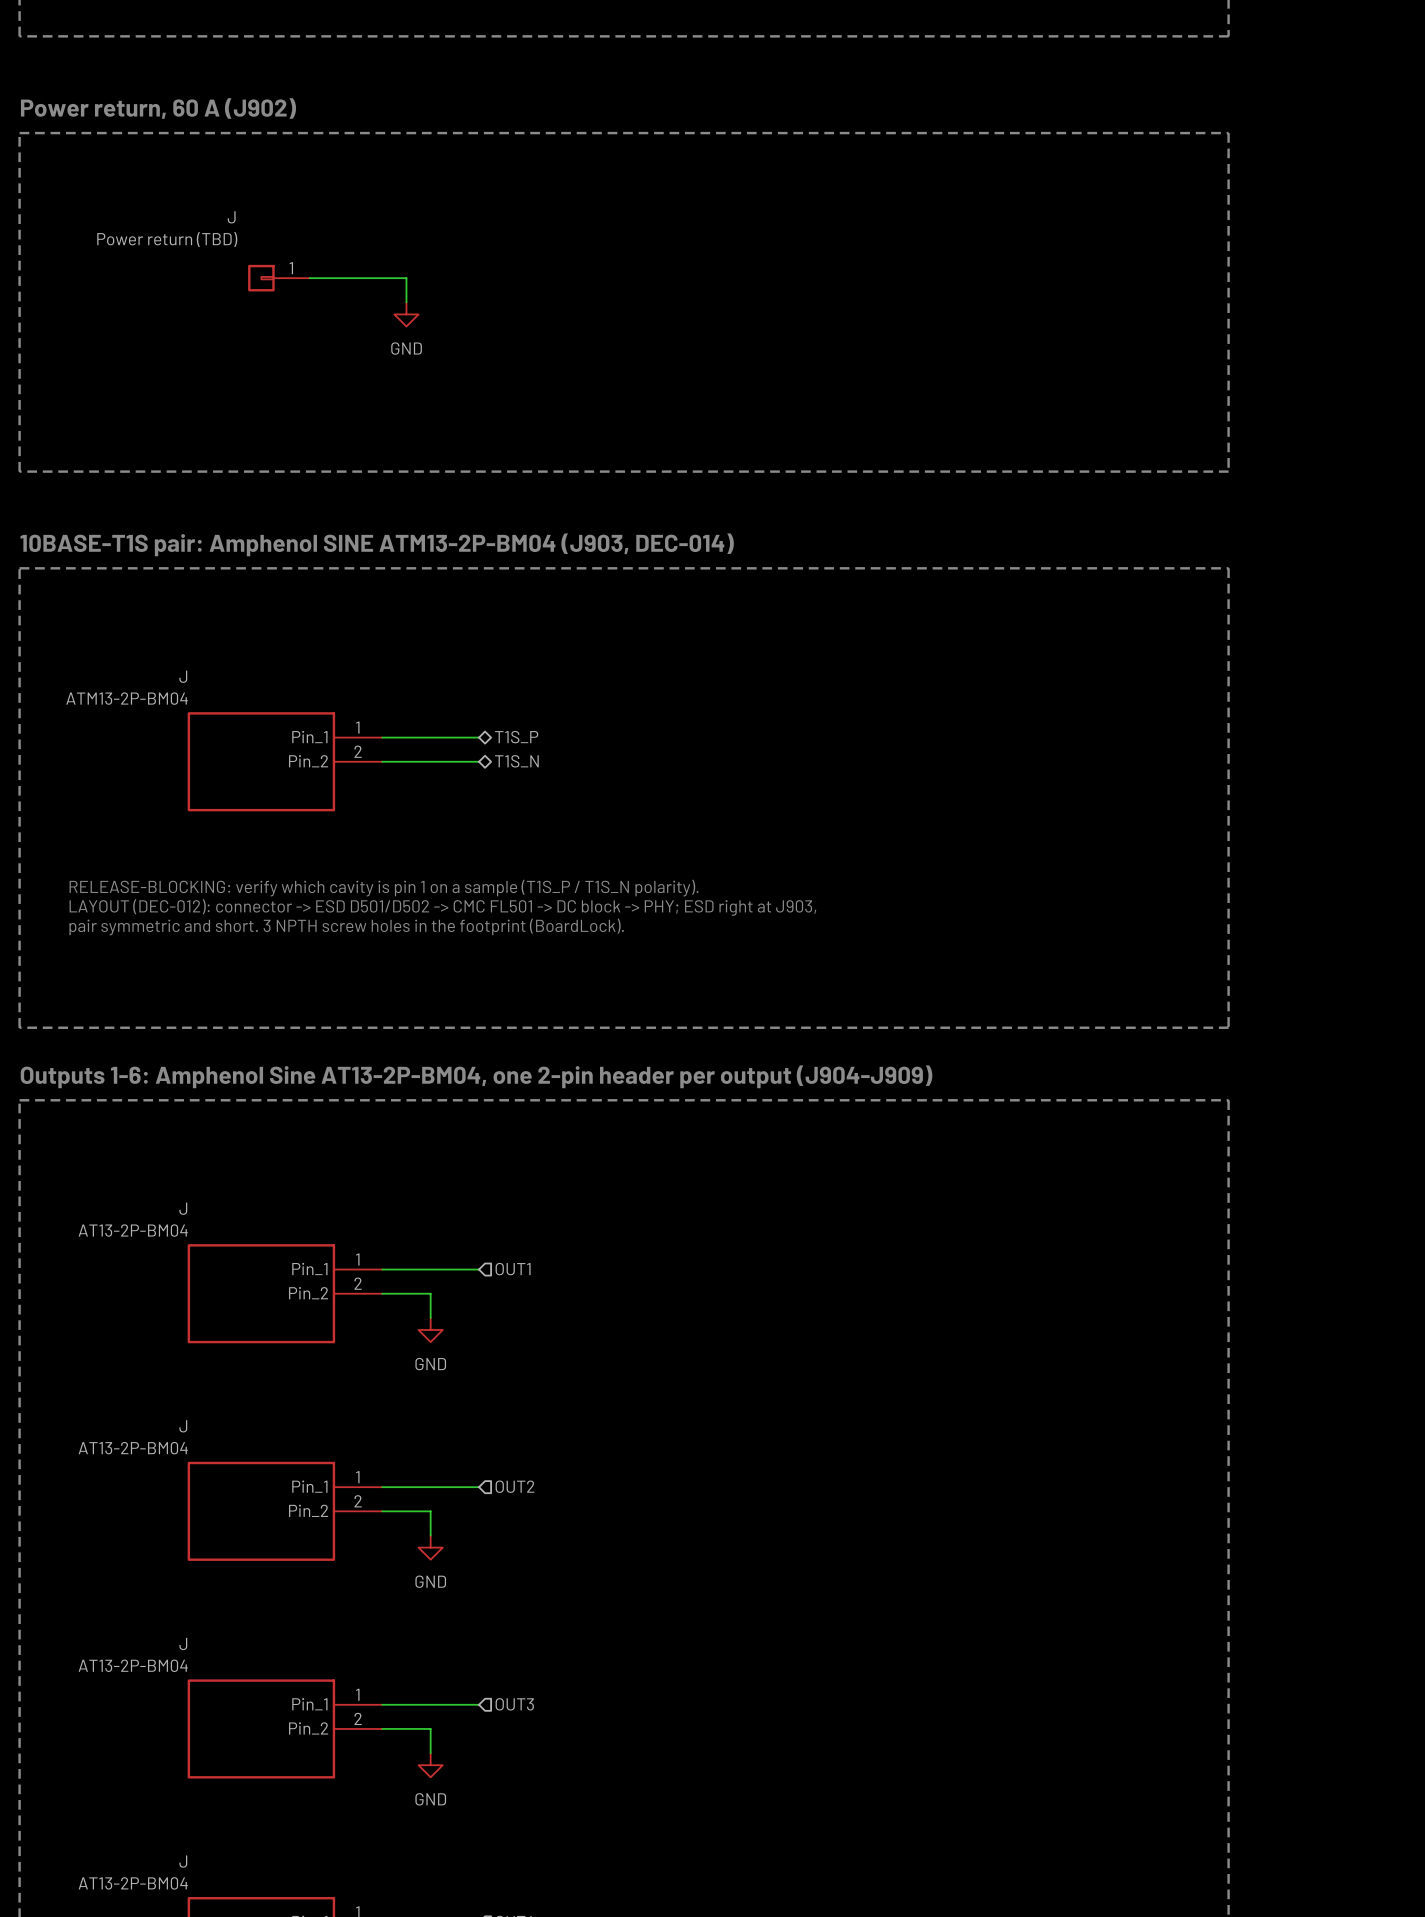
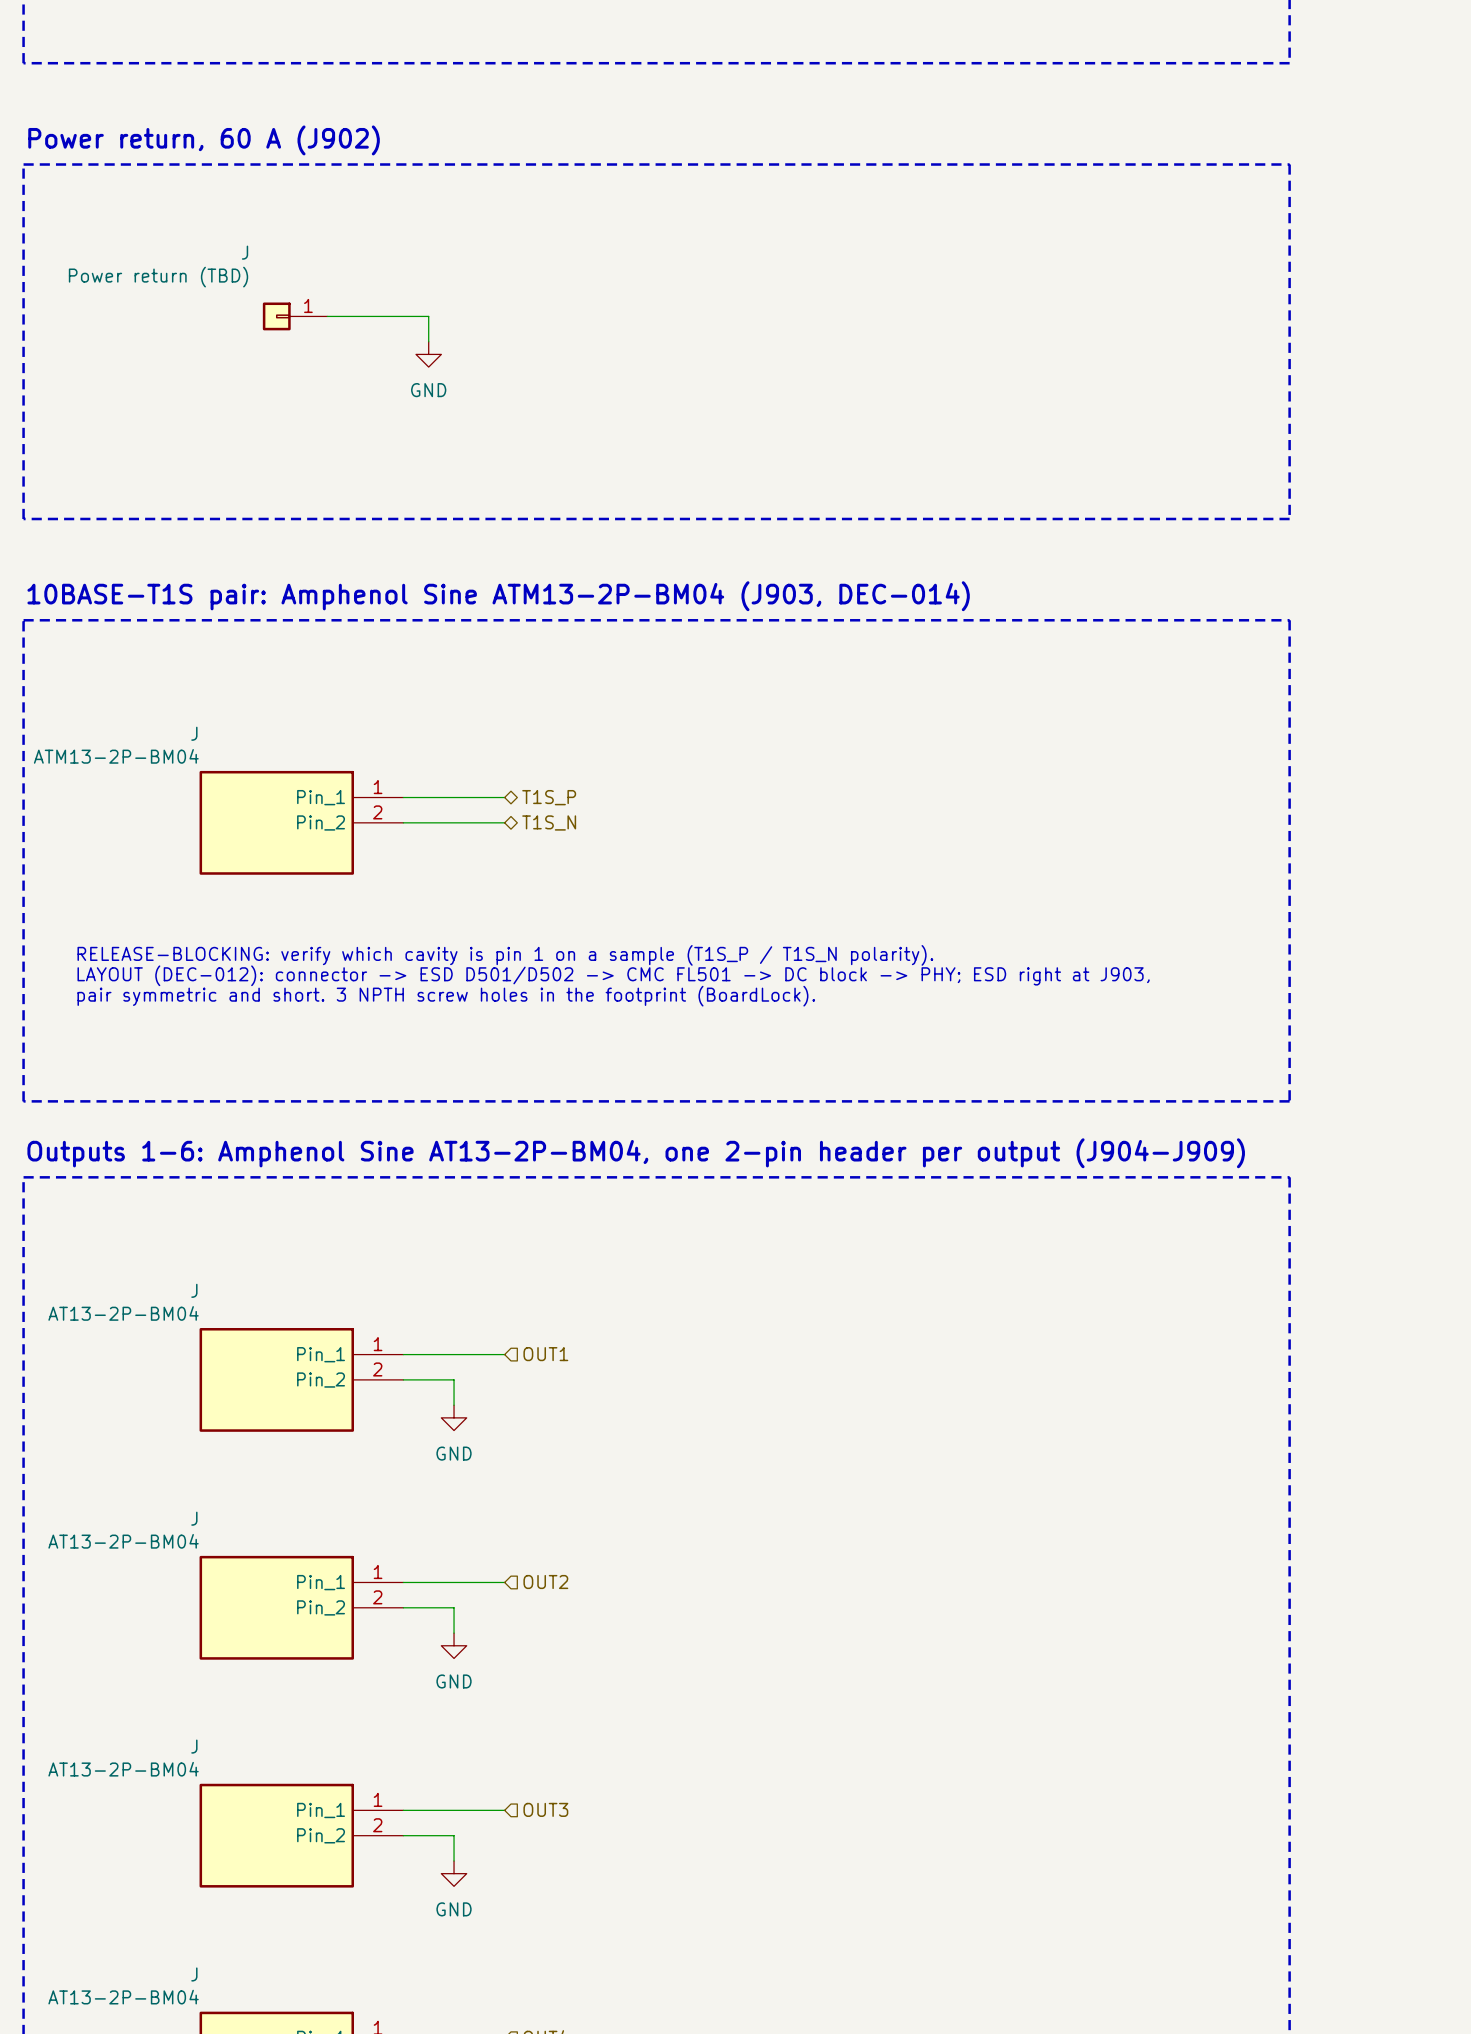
text: 10BASE-T1S pair: Amphenol SINE ATM13-2P-BM04 (J903, DEC-014) (377, 544) -> 10BASE-T1S pair: Amphenol Sine ATM13-2P-BM04 (J903, DEC-014) (498, 596)

